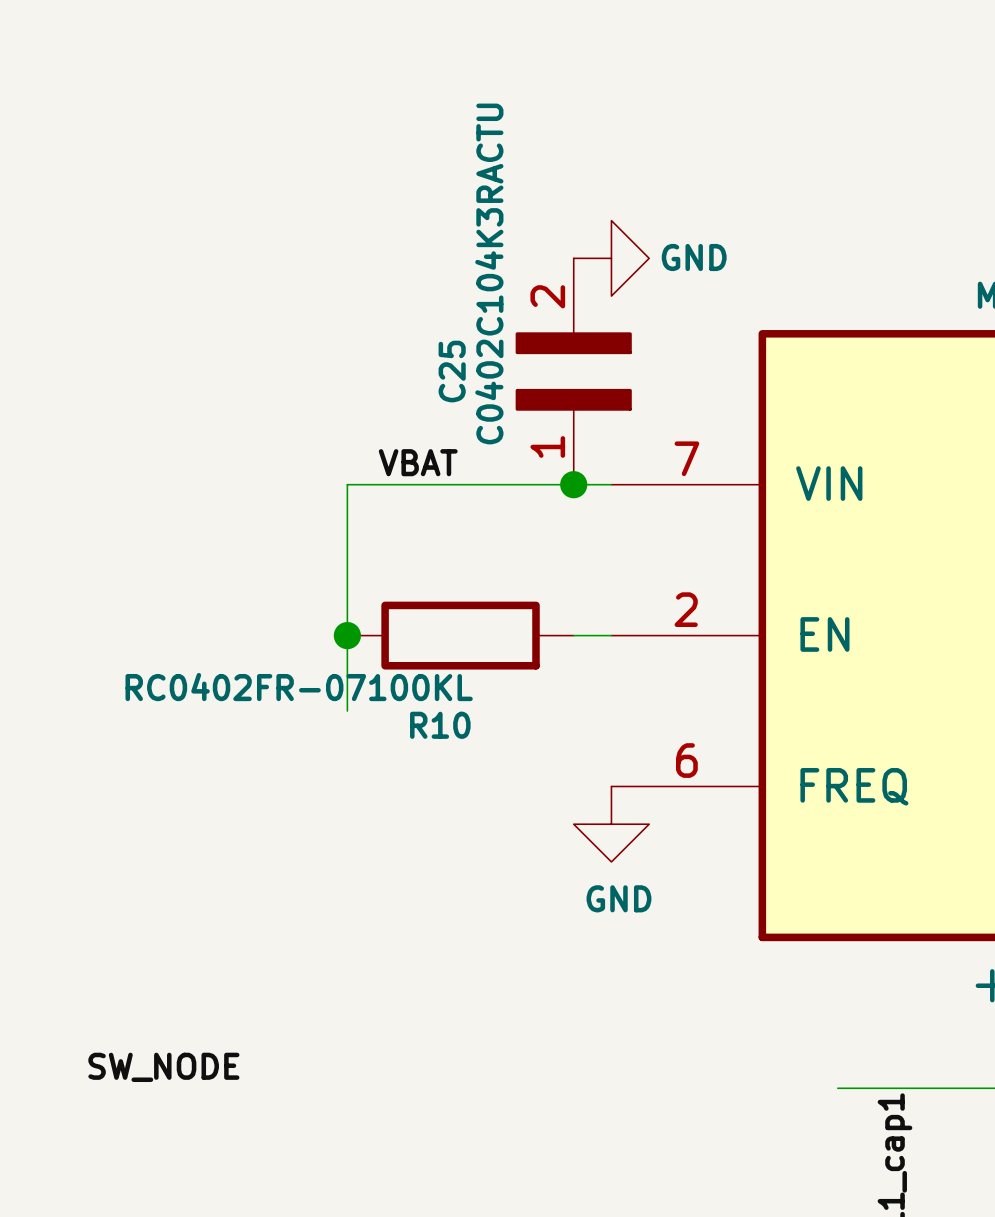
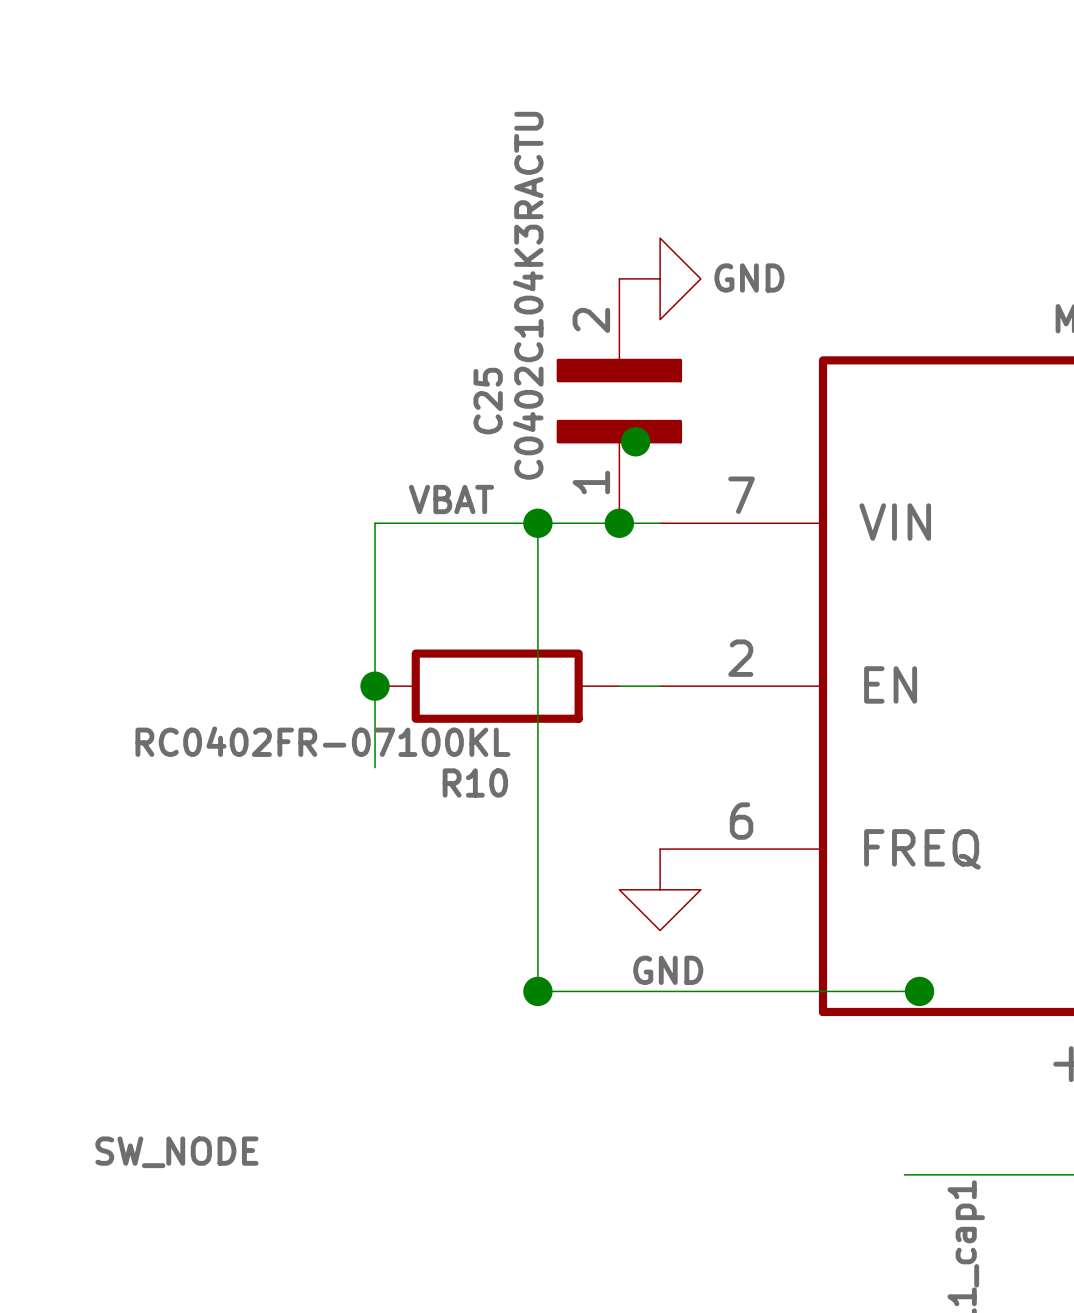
junction: none -> (635, 441)
wire: none -> (537, 523) (537, 991) (919, 991)
junction: none -> (537, 523)
junction: none -> (537, 991)
junction: none -> (919, 991)

